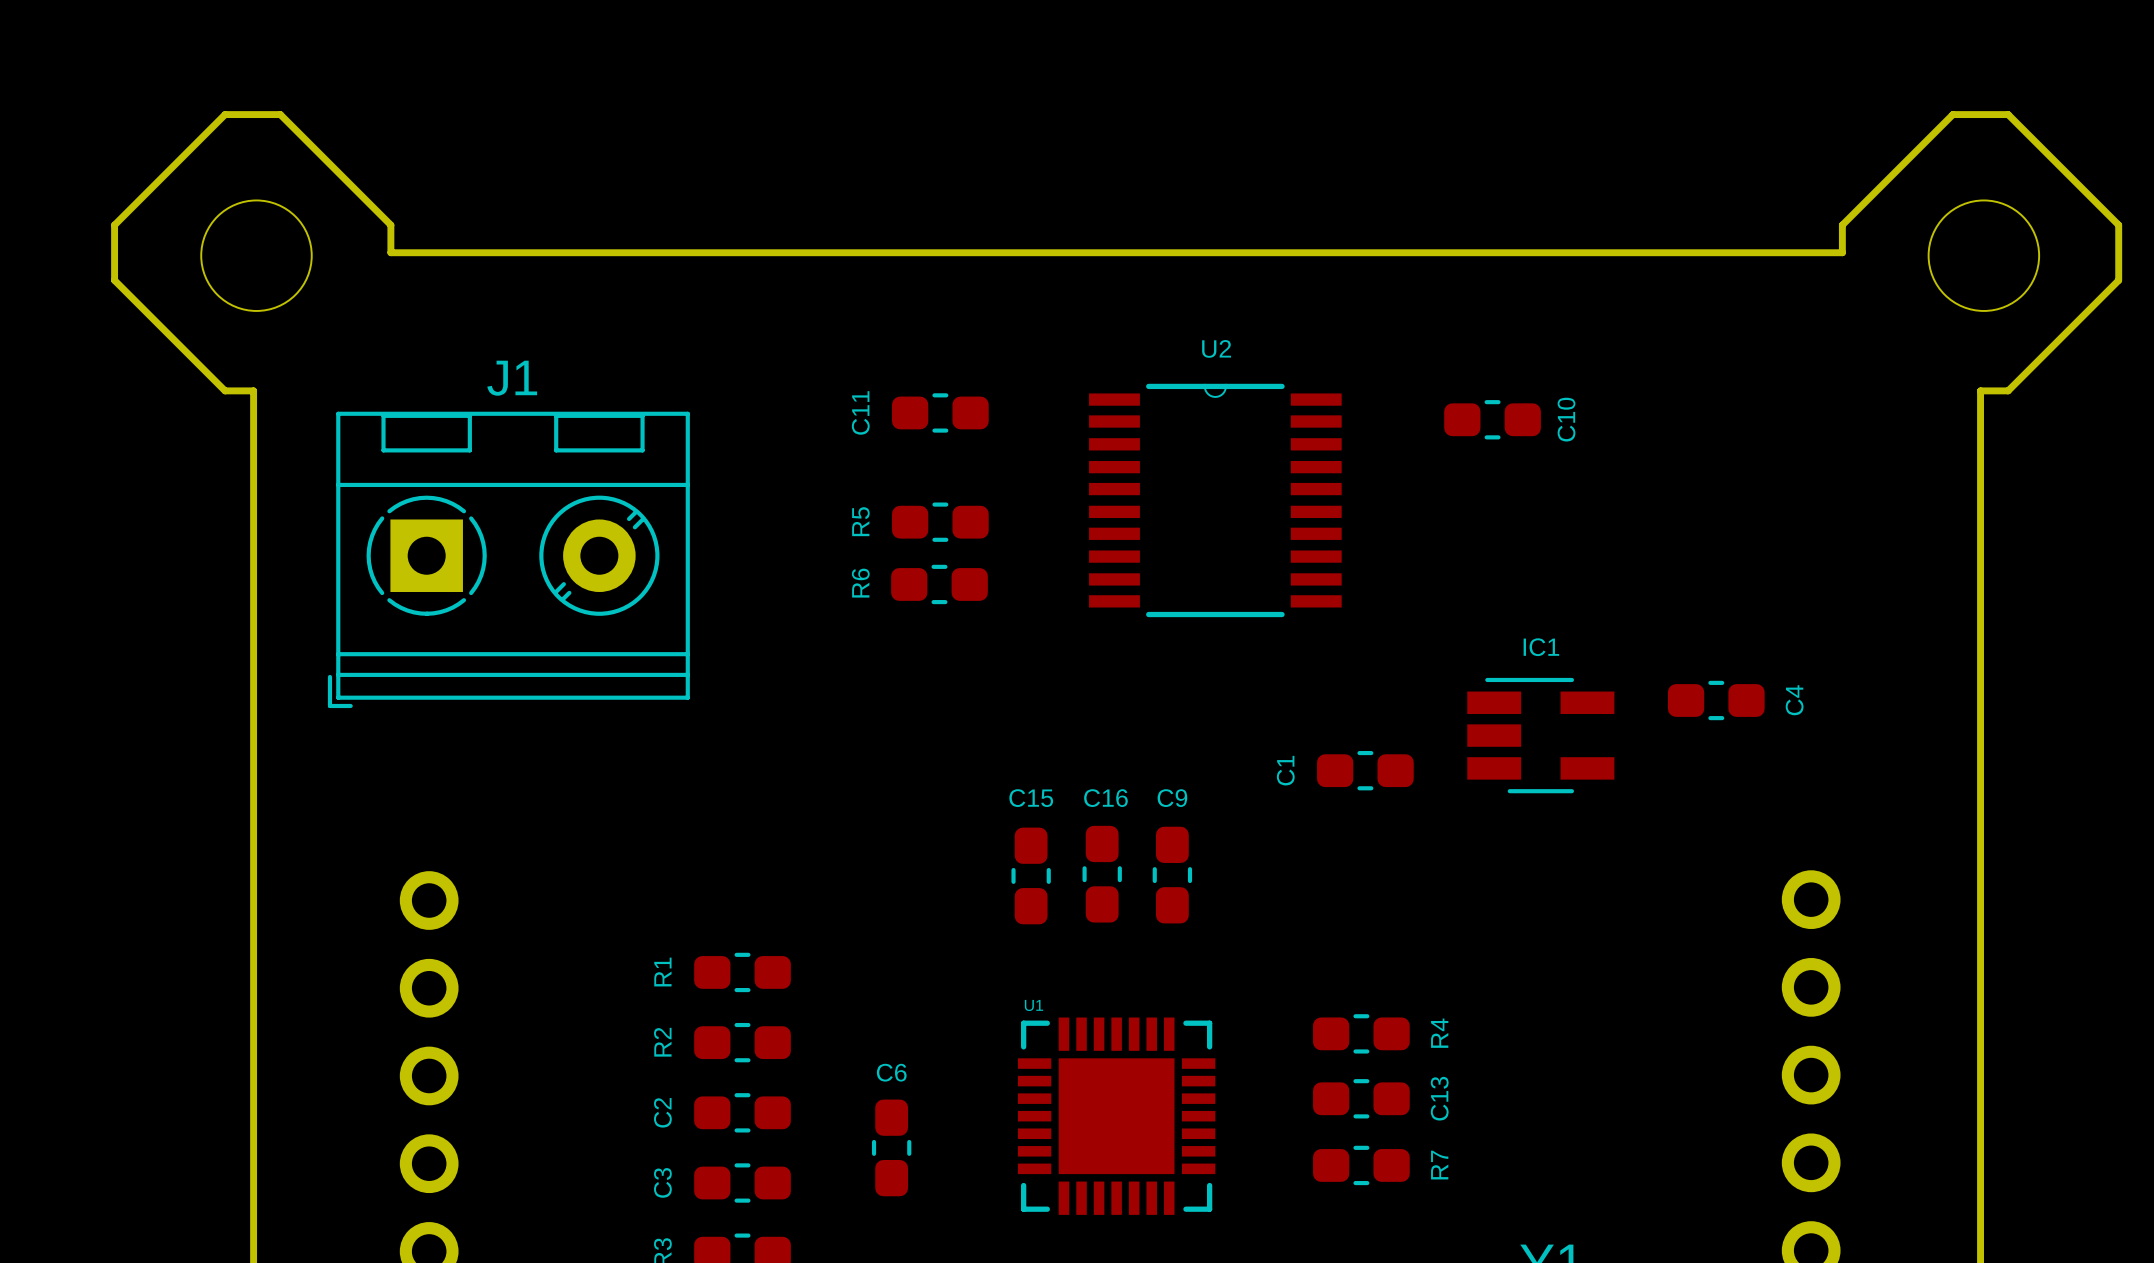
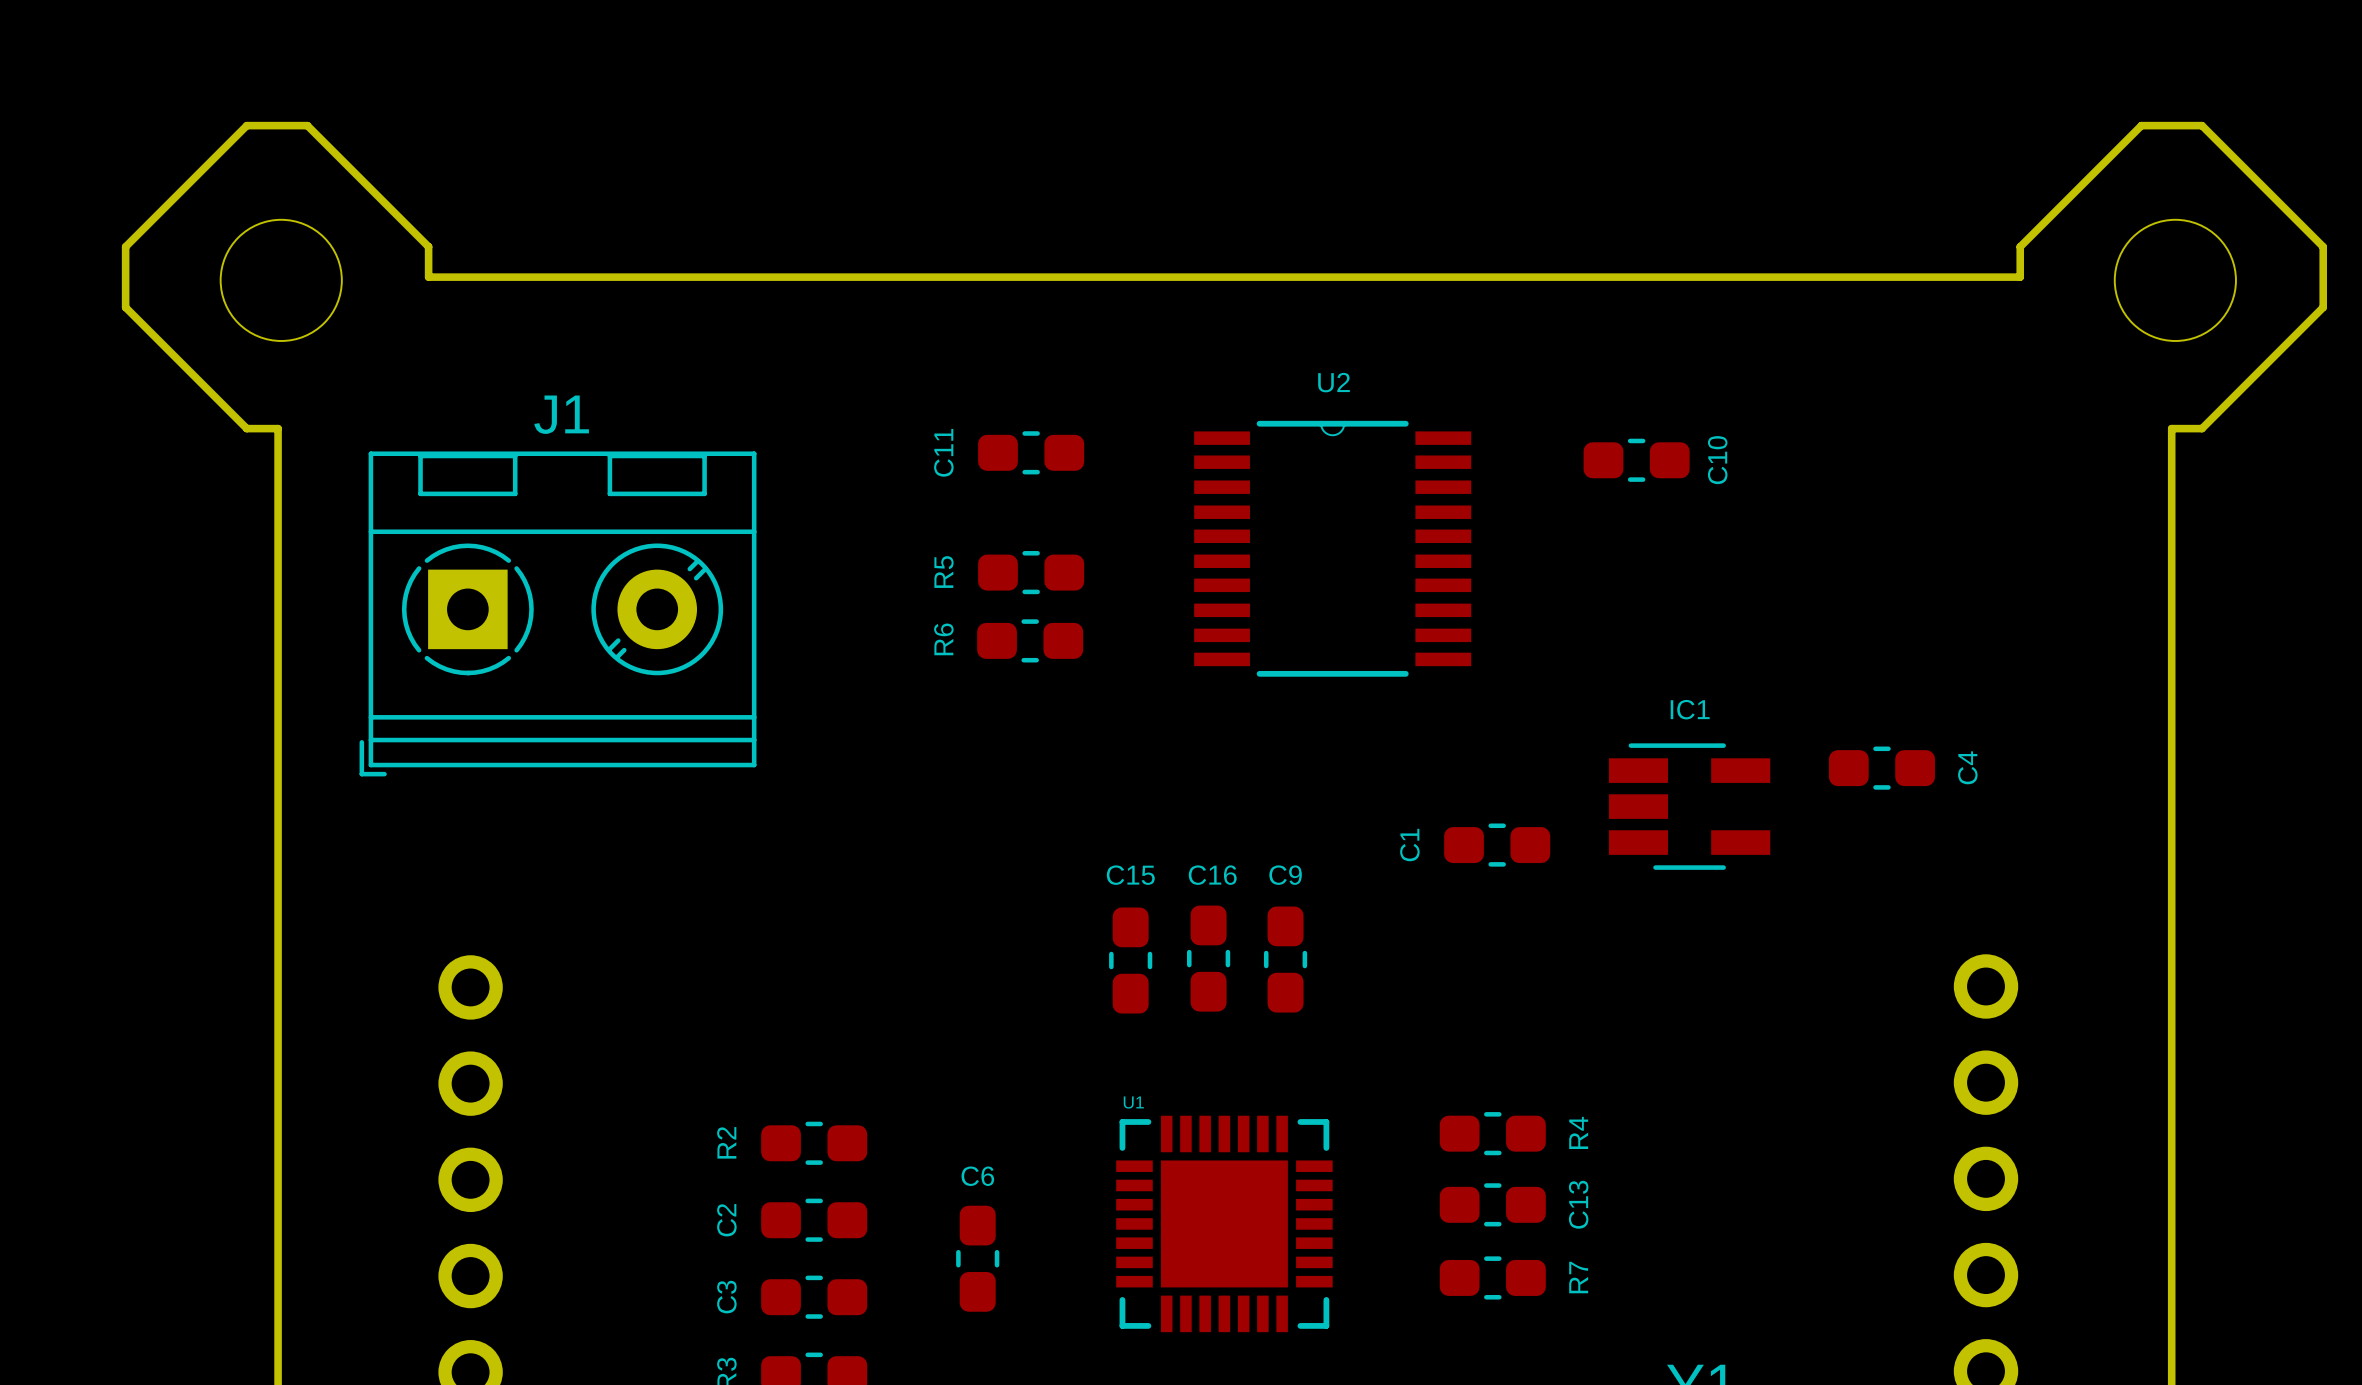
R1: (742, 972) -> none

